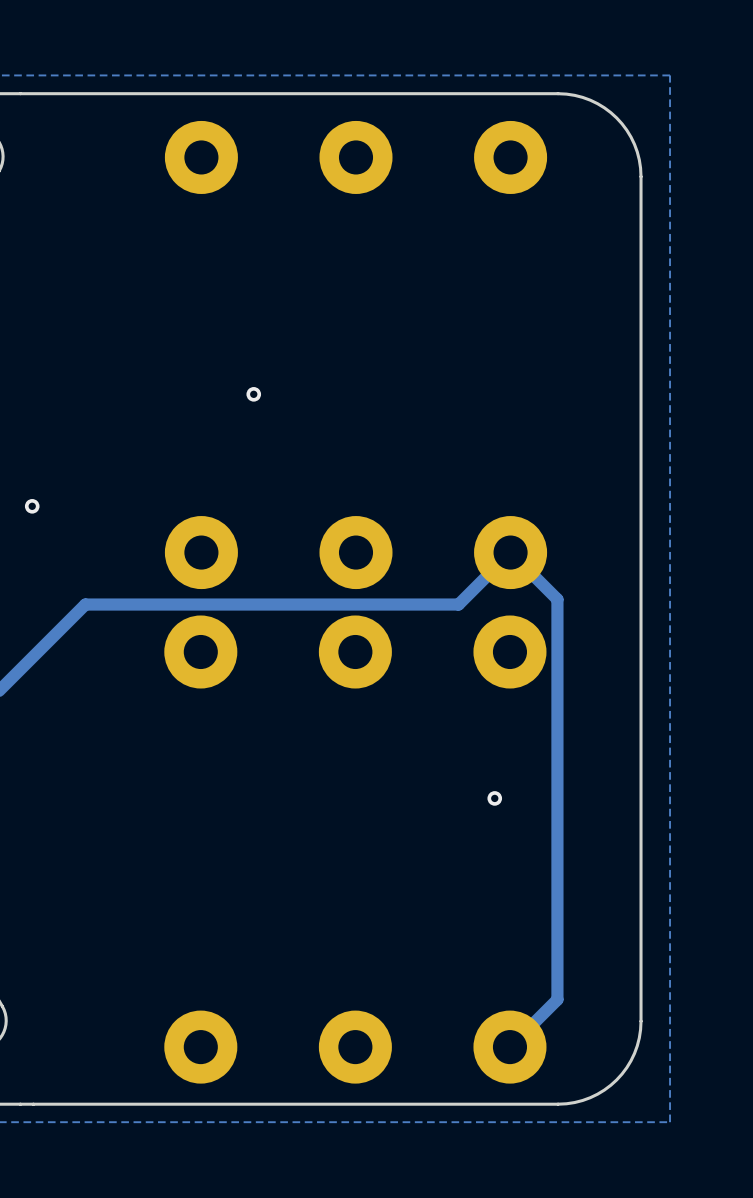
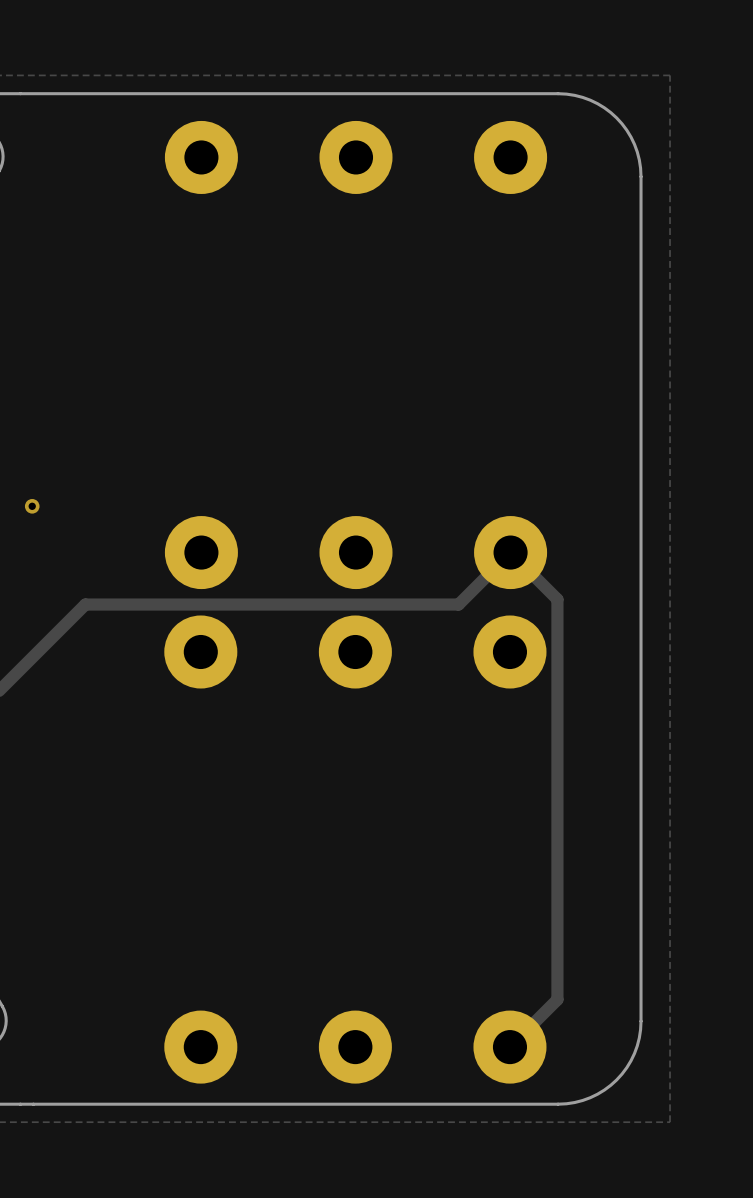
via: (253, 394) -> none
via: (494, 798) -> none

